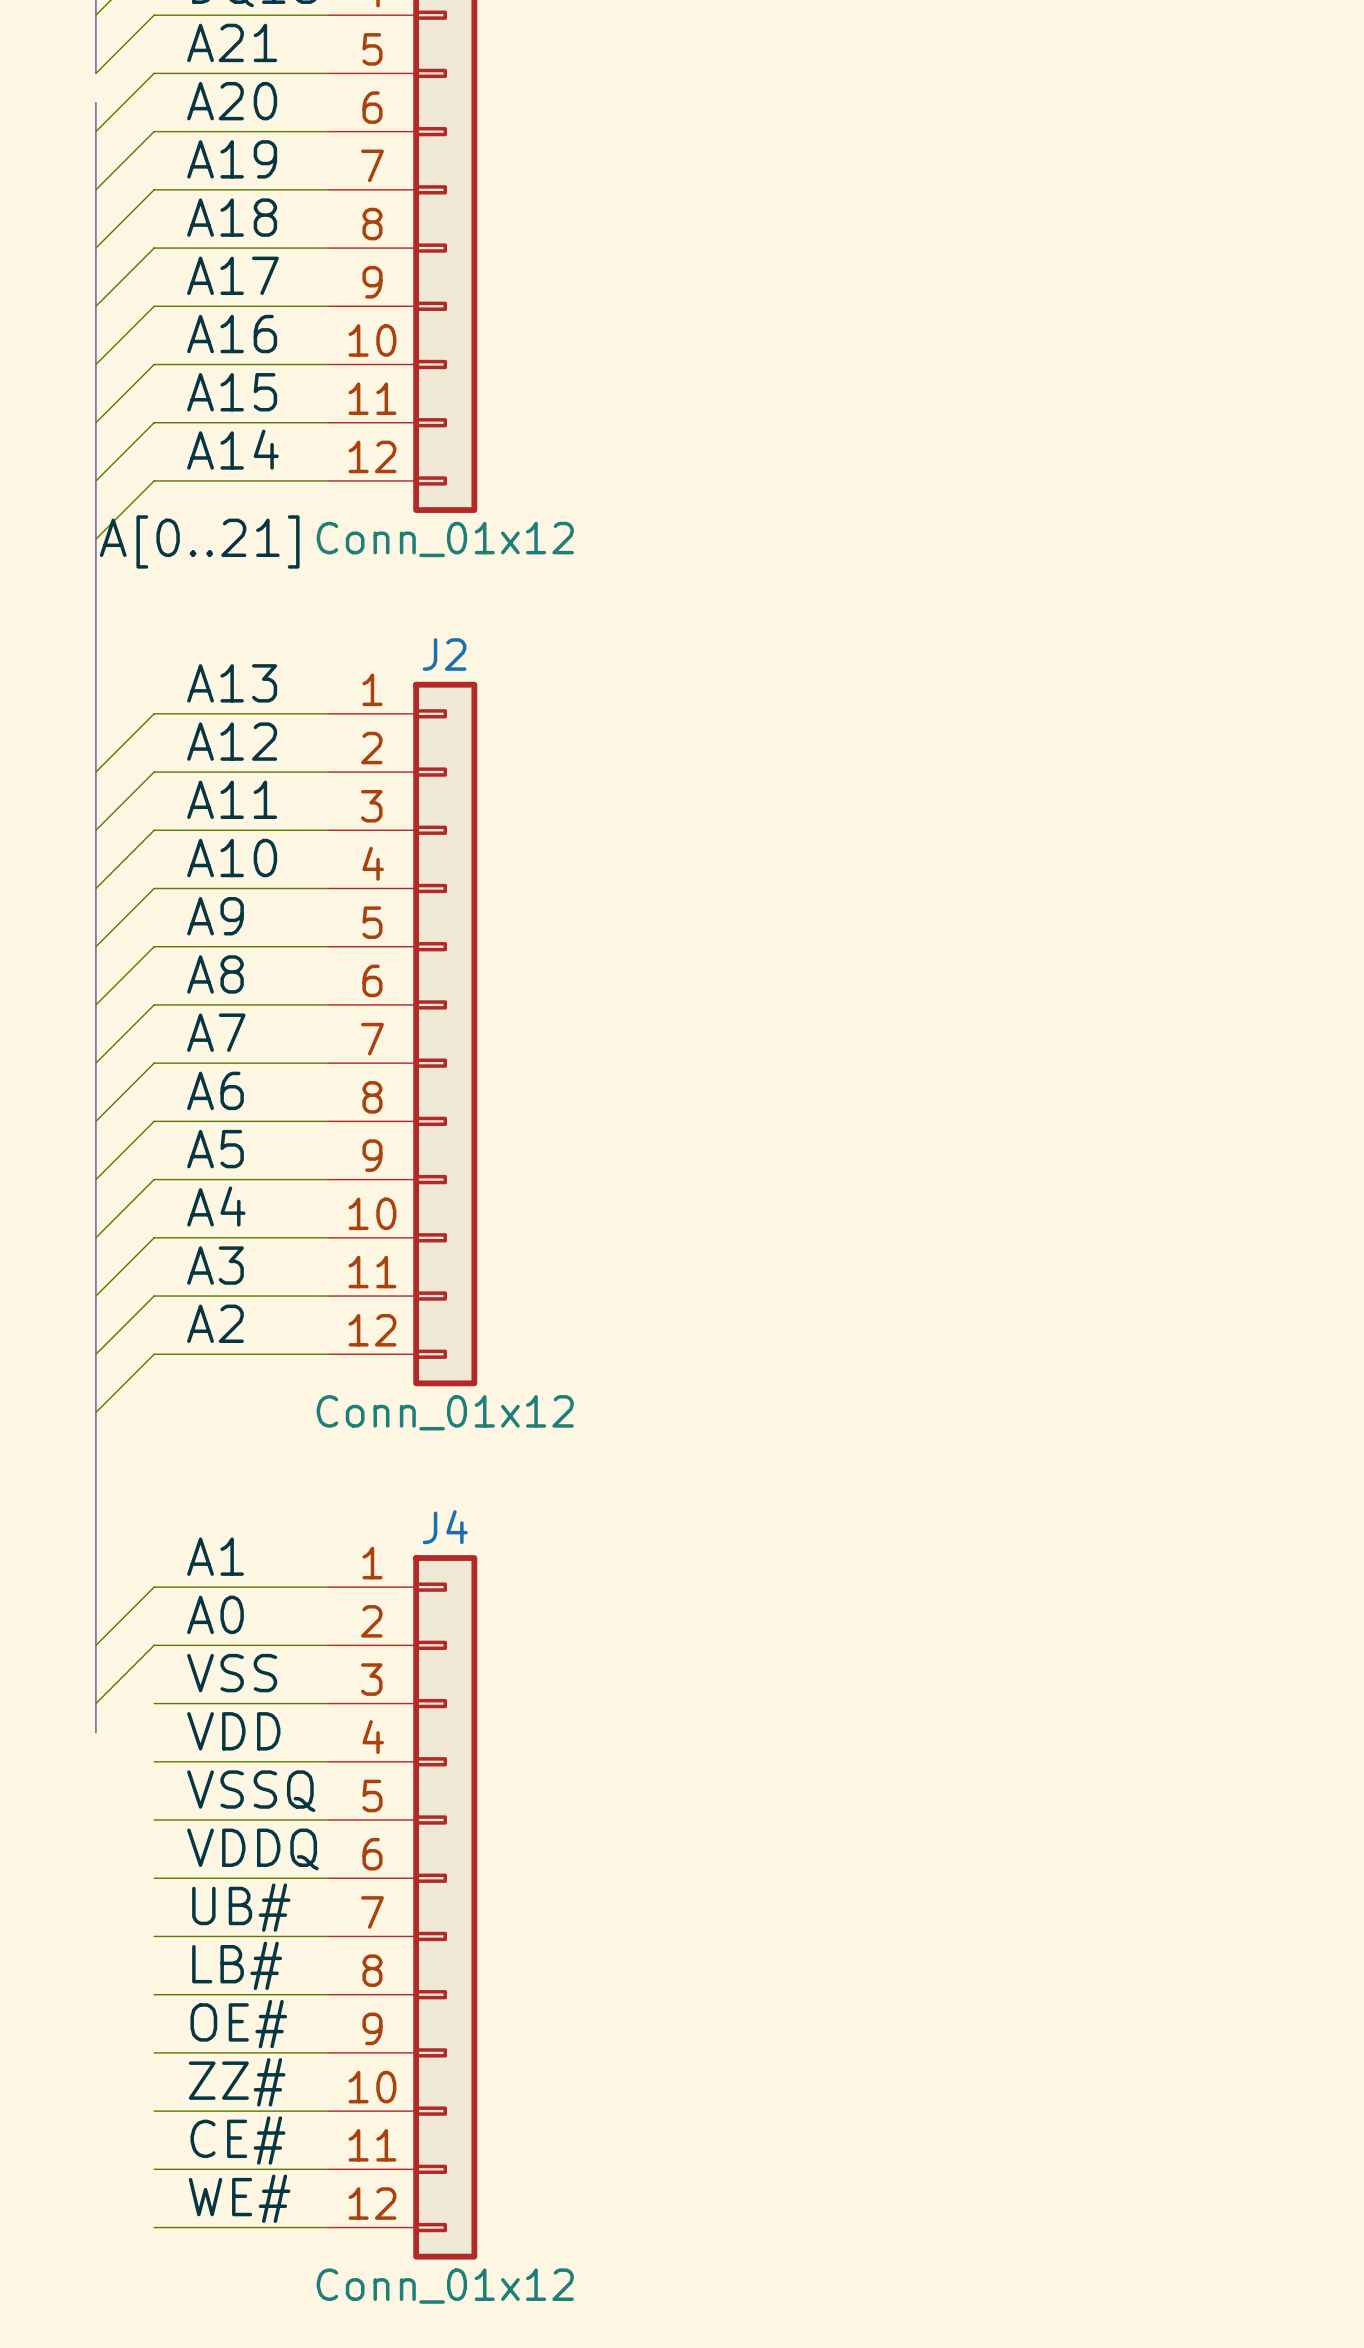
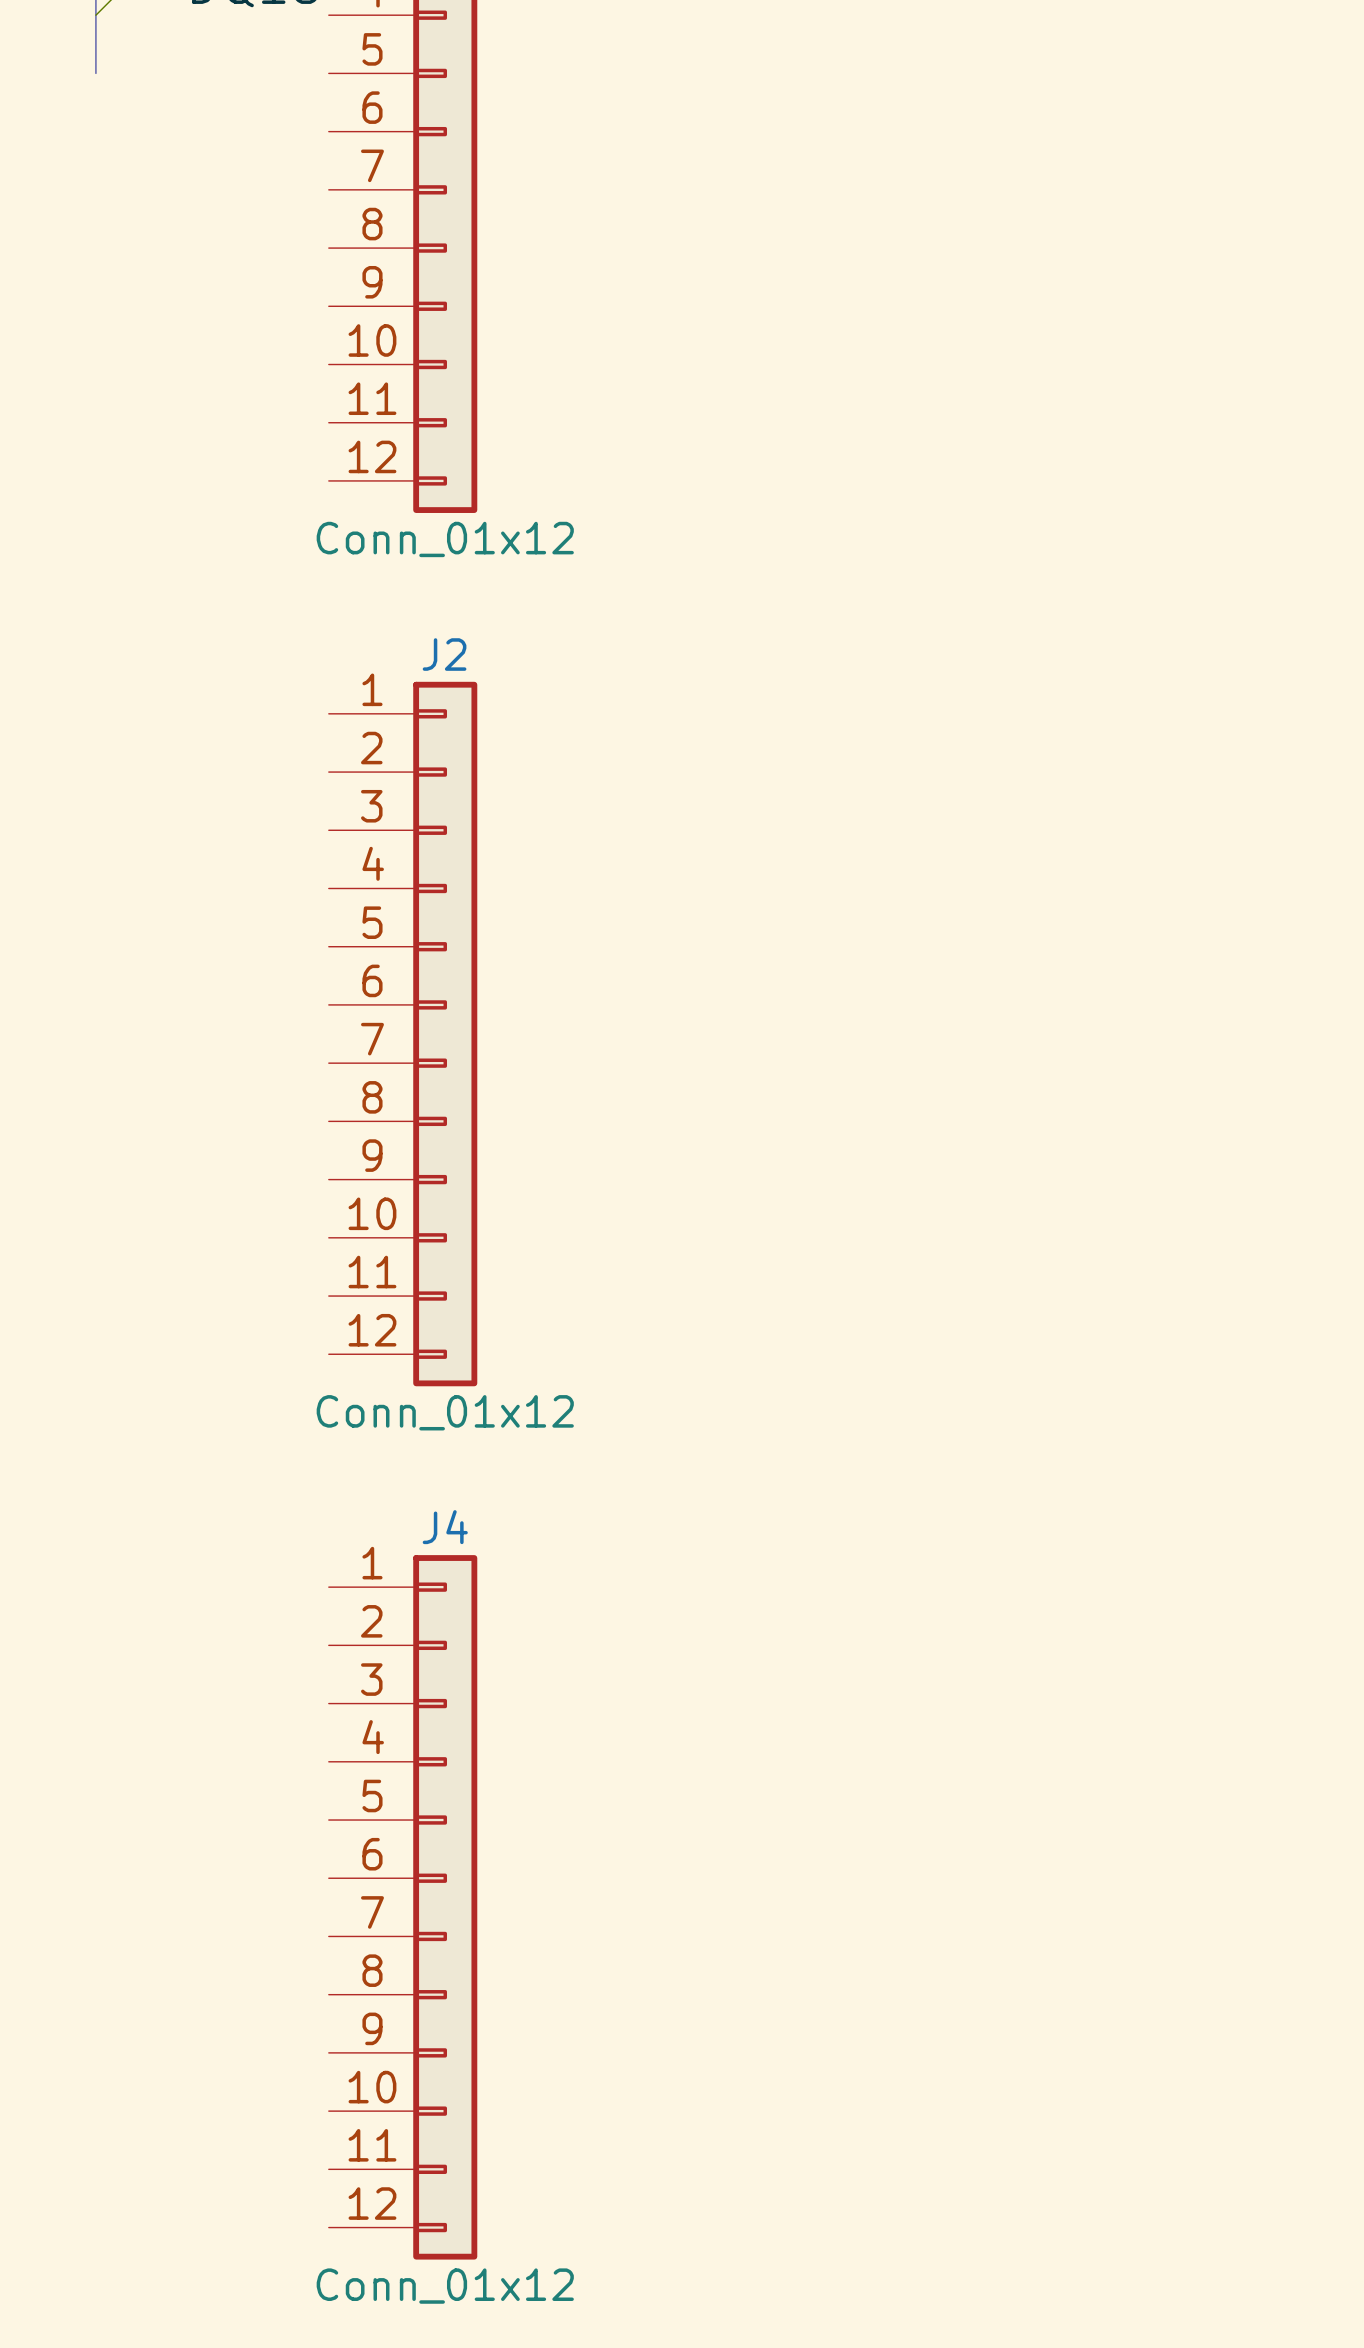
wire: (328, 15) (154, 15) (95, 73) -> none
label: A21 (232, 42) -> none
wire: (328, 73) (154, 73) (95, 131) -> none
label: A20 (232, 101) -> none
bus: (95, 102) (95, 1732) -> none
wire: (328, 131) (154, 131) (95, 189) -> none
label: A19 (232, 159) -> none
wire: (328, 189) (154, 189) (95, 248) -> none
label: A18 (232, 217) -> none
wire: (328, 248) (154, 248) (95, 306) -> none
label: A17 (232, 275) -> none
wire: (328, 306) (154, 306) (95, 364) -> none
label: A16 (232, 334) -> none
wire: (328, 364) (154, 364) (95, 422) -> none
label: A15 (232, 392) -> none
wire: (328, 422) (154, 422) (95, 480) -> none
label: A14 (232, 449) -> none
wire: (328, 480) (154, 480) (95, 539) -> none
label: A[0..21] (199, 541) -> none
label: A13 (232, 683) -> none
wire: (328, 713) (154, 713) (95, 772) -> none
label: A12 (232, 741) -> none
wire: (328, 772) (154, 772) (95, 830) -> none
label: A11 (232, 799) -> none
wire: (328, 830) (154, 830) (95, 888) -> none
label: A10 (232, 858) -> none
wire: (328, 888) (154, 888) (95, 946) -> none
label: A9 (215, 916) -> none
wire: (328, 946) (154, 946) (95, 1004) -> none
label: A8 (215, 974) -> none
wire: (328, 1004) (154, 1004) (95, 1063) -> none
label: A7 (216, 1032) -> none
wire: (328, 1063) (154, 1063) (95, 1121) -> none
label: A6 (215, 1090) -> none
wire: (328, 1121) (154, 1121) (95, 1179) -> none
label: A5 (215, 1149) -> none
wire: (328, 1179) (154, 1179) (95, 1237) -> none
label: A4 (216, 1206) -> none
wire: (328, 1237) (154, 1237) (95, 1296) -> none
label: A3 (215, 1265) -> none
wire: (328, 1296) (154, 1296) (95, 1354) -> none
label: A2 (215, 1323) -> none
wire: (328, 1354) (154, 1354) (95, 1412) -> none
label: A1 (215, 1556) -> none
wire: (328, 1587) (154, 1587) (95, 1645) -> none
label: A0 (215, 1614) -> none
wire: (328, 1645) (154, 1645) (95, 1703) -> none
label: VSS (232, 1673) -> none
wire: (154, 1703) (328, 1703) -> none
label: VDD (233, 1731) -> none
wire: (154, 1761) (328, 1761) -> none
label: VSSQ (251, 1791) -> none
wire: (154, 1820) (328, 1820) -> none
label: VDDQ (252, 1849) -> none
wire: (154, 1878) (328, 1878) -> none
label: UB# (241, 1907) -> none
wire: (154, 1936) (328, 1936) -> none
label: LB# (237, 1965) -> none
wire: (154, 1994) (328, 1994) -> none
label: OE# (238, 2024) -> none
wire: (154, 2052) (328, 2052) -> none
label: ZZ# (237, 2082) -> none
wire: (154, 2111) (328, 2111) -> none
label: CE# (237, 2140) -> none
wire: (154, 2169) (328, 2169) -> none
label: WE# (239, 2198) -> none
wire: (154, 2227) (328, 2227) -> none

